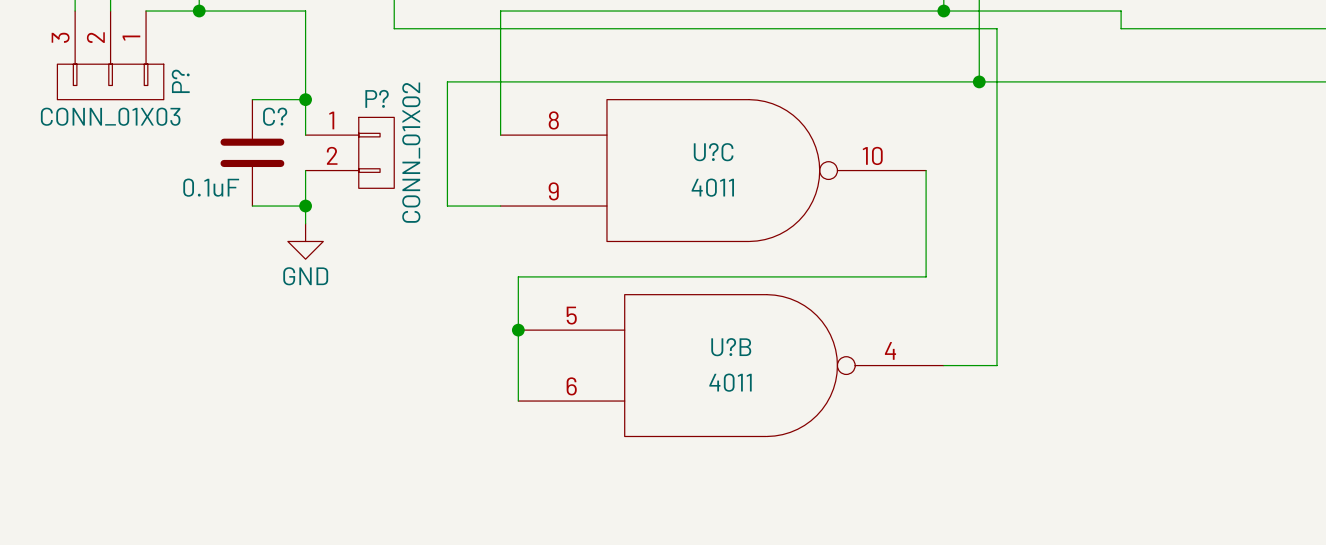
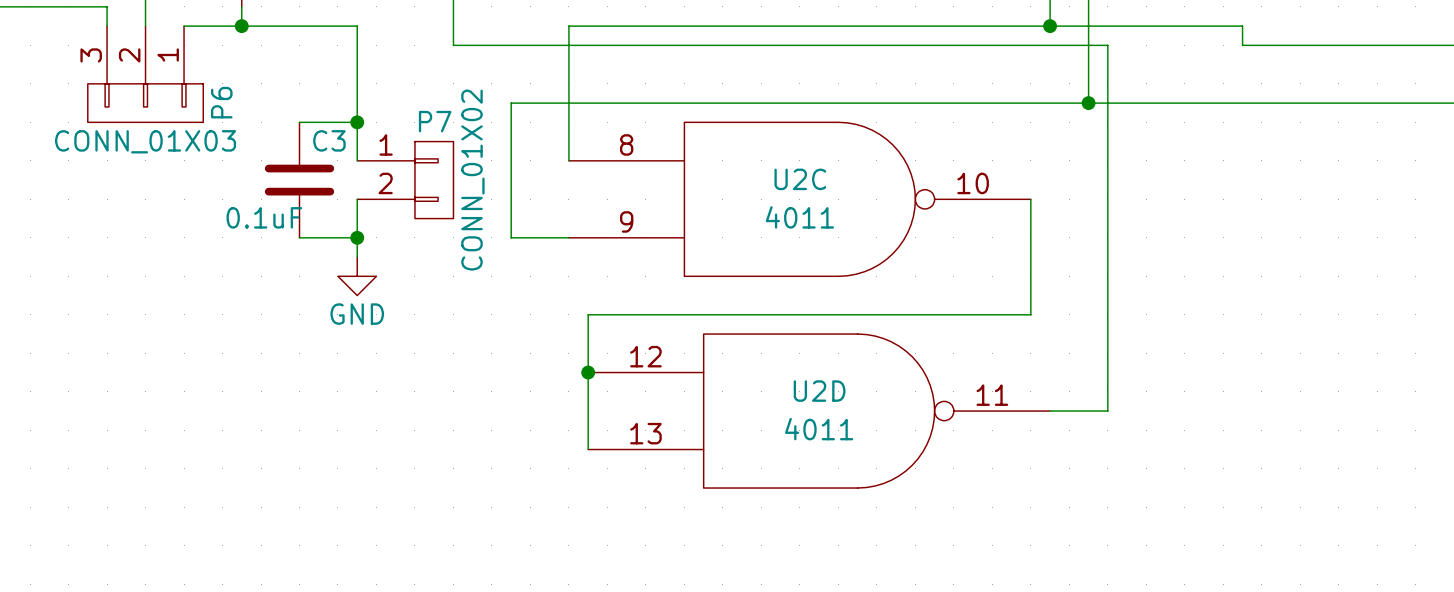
P? name: P? (180, 81) -> P6 (221, 102)
P? name: P? (377, 98) -> P7 (435, 121)
C? name: C? (275, 116) -> C3 (329, 140)
U?C name: U?C (713, 152) -> U2C (800, 179)
U?B pin number: 5 (571, 315) -> 12 (645, 356)
U?B name: U?B (731, 347) -> U2D (819, 391)
U?B pin number: 4 (890, 350) -> 11 (992, 395)
U?B pin number: 6 (571, 386) -> 13 (645, 433)

